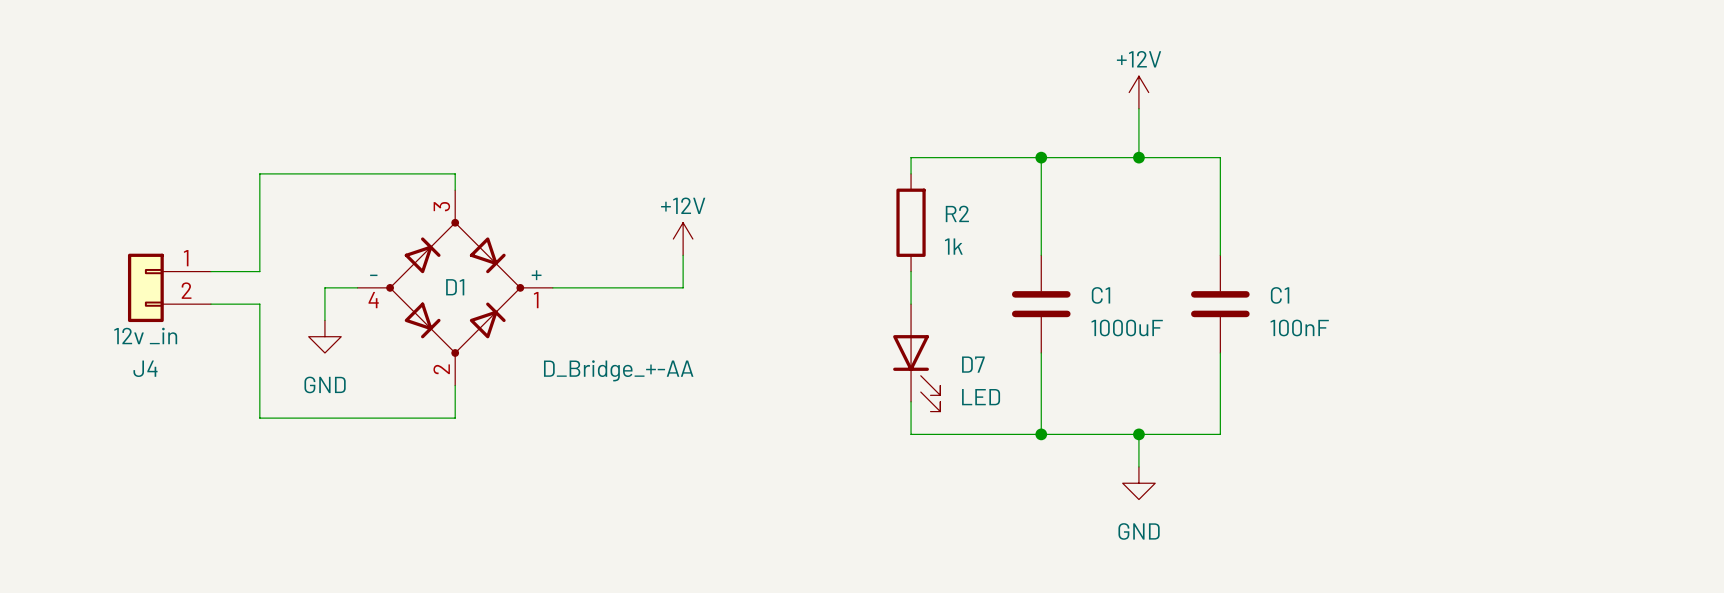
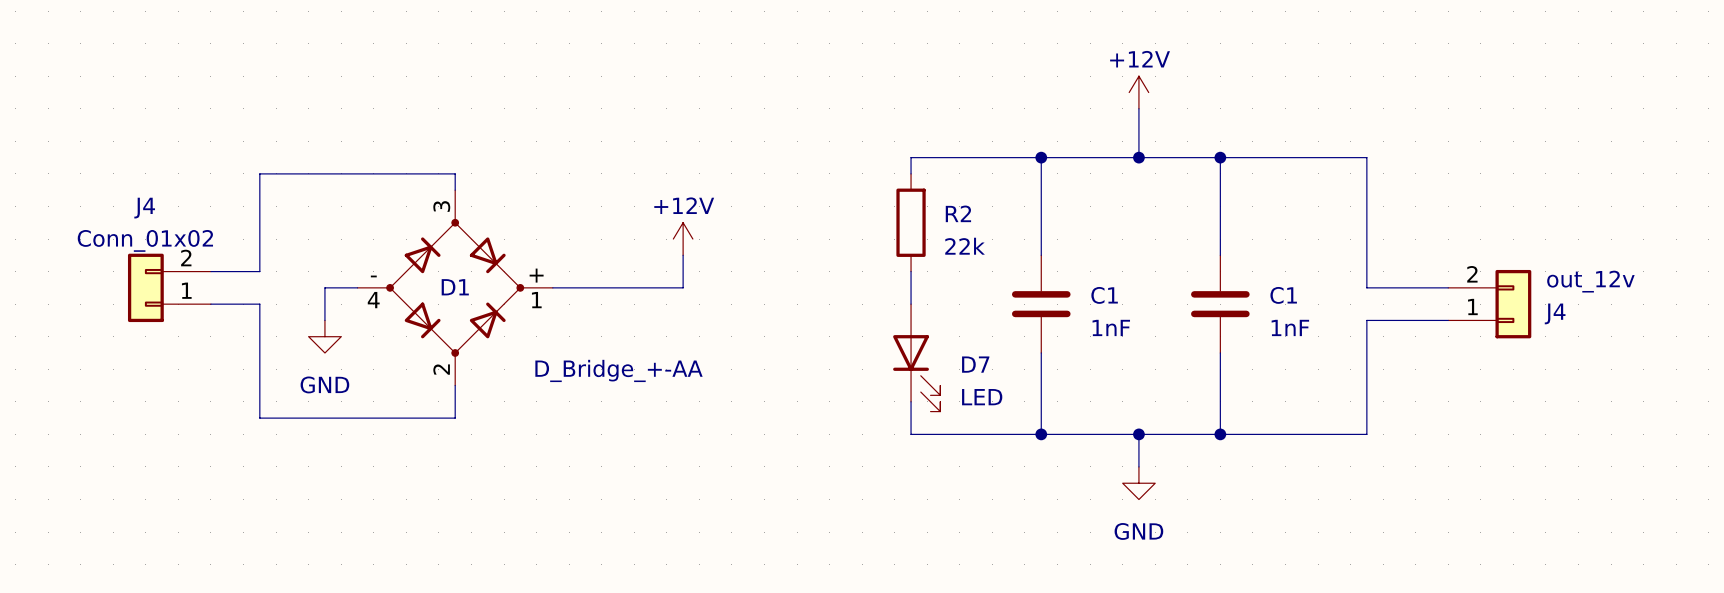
wire: none -> (1220, 157) (1366, 157) (1366, 287) (1448, 287)
junction: none -> (1220, 157)
R2 value: 1k (953, 246) -> 22k (965, 246)
J4 flip: as is (145, 287) -> up-down (145, 287)
J4: none -> out_12v (1489, 304)
wire: none -> (1448, 320) (1366, 320) (1366, 434) (1220, 434)
C1 value: 1000uF (1127, 327) -> 1nF (1111, 327)
C1 value: 100nF (1299, 327) -> 1nF (1290, 327)
J4 value: 12v _in (145, 335) -> Conn_01x02 (145, 240)
junction: none -> (1220, 434)

